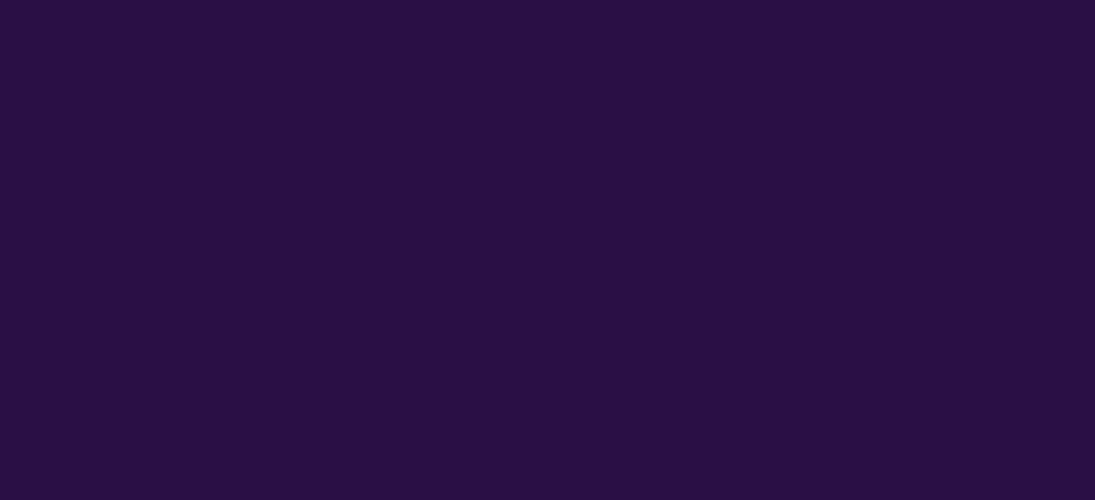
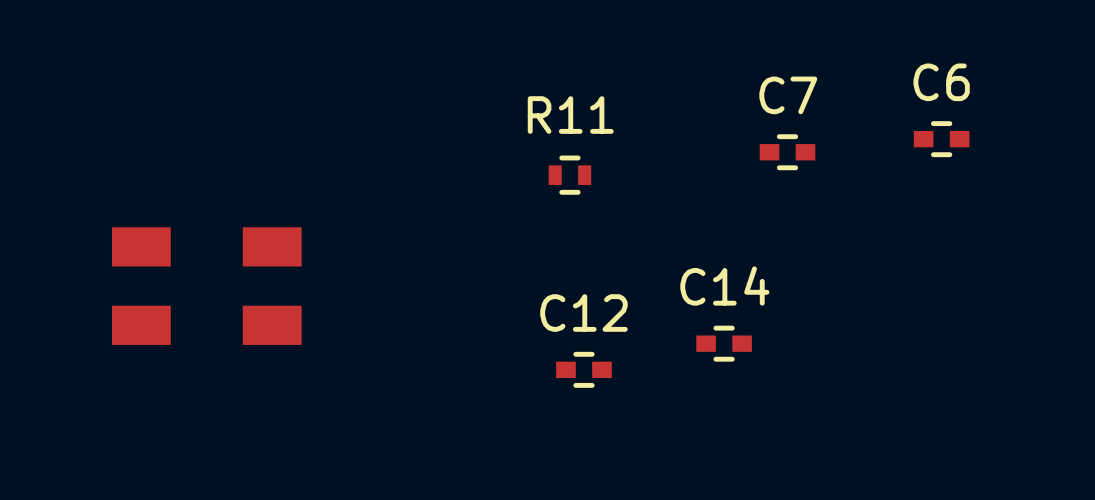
C6: none -> (941, 139)
C7: none -> (787, 152)
R11: none -> (569, 175)
part: none -> (206, 286)
C14: none -> (724, 343)
C12: none -> (583, 369)

